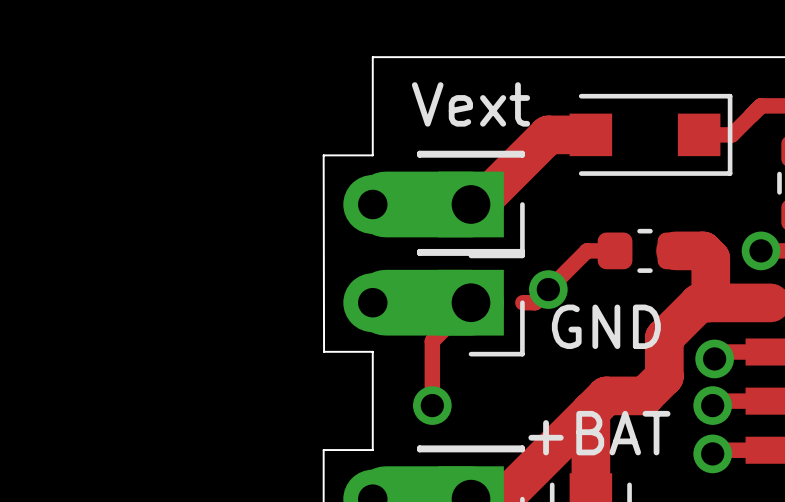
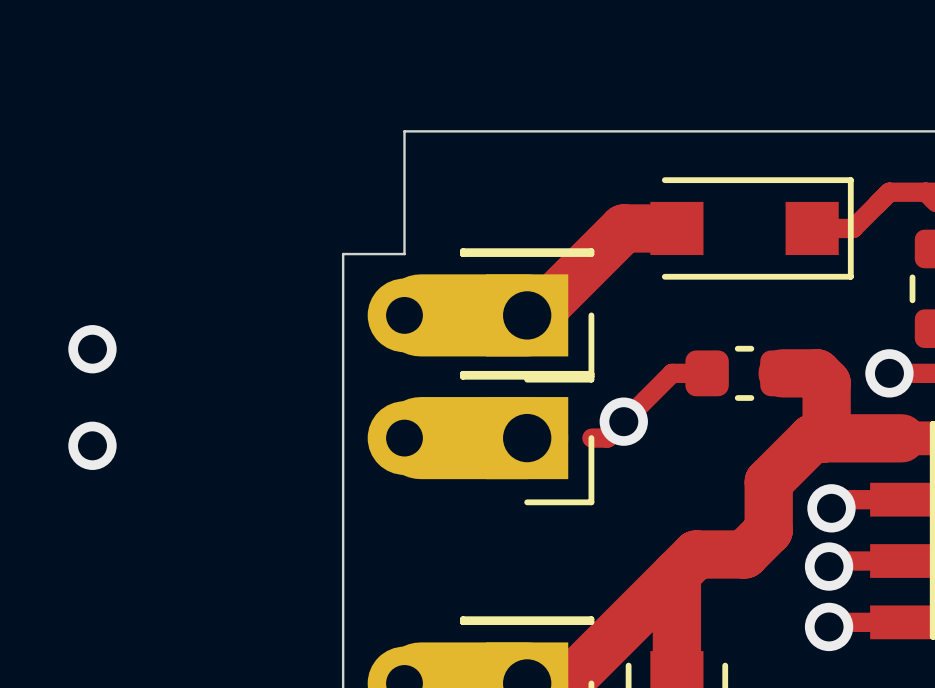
text: Vext (471, 104) -> none
board edge: (323, 155) (324, 351) (372, 351) (372, 450) (323, 450) -> (343, 254) (343, 622)
via: none -> (92, 349)
track: (471, 302) (432, 341) (432, 405) -> none
via: none -> (92, 445)
text: GND (606, 326) -> none
via: (432, 405) -> none
text: +BAT (599, 433) -> none

